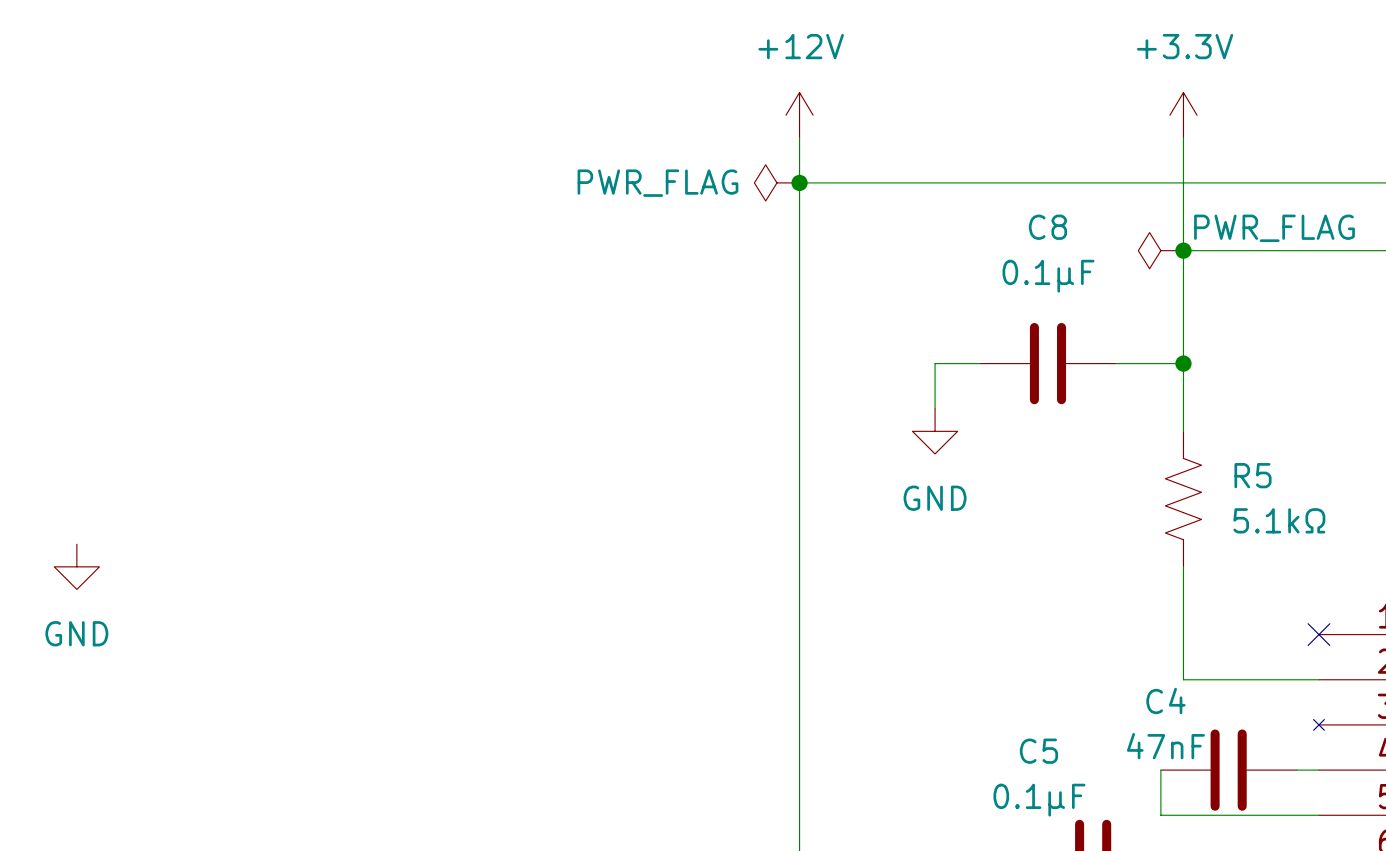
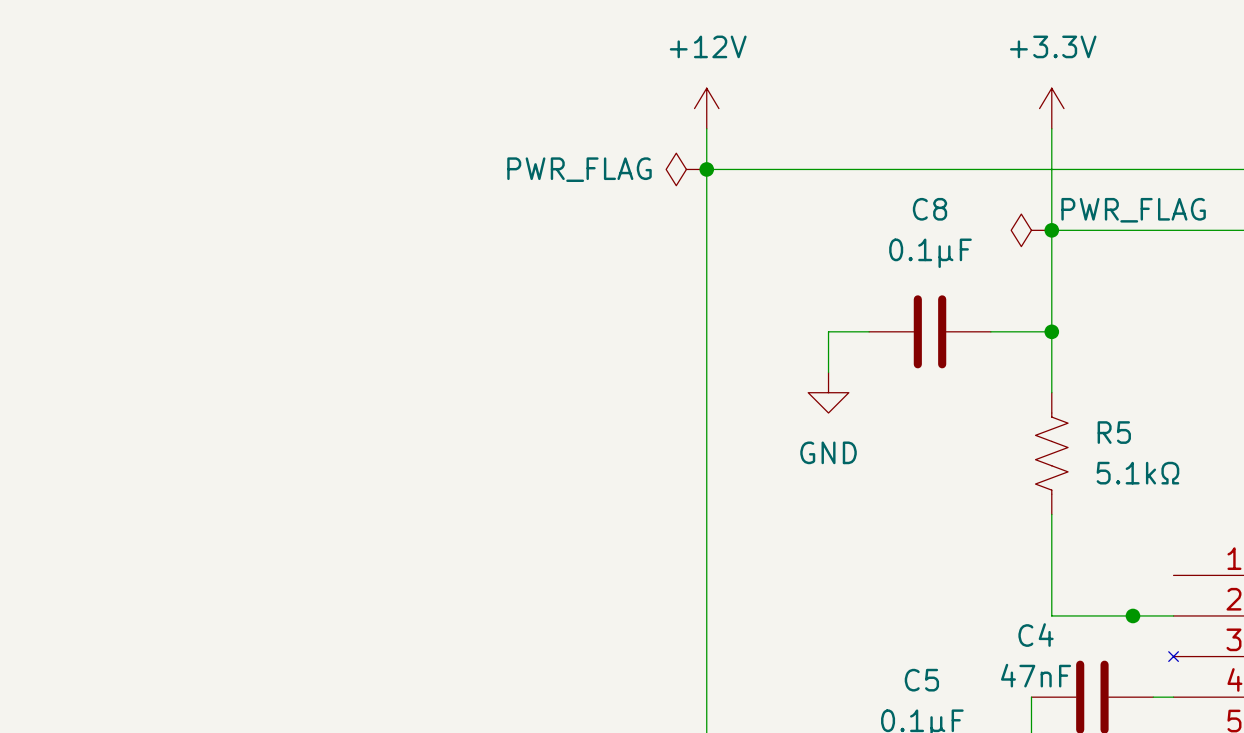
power symbol: GND (76, 566) -> none
no-connect mark: (1318, 634) -> none
junction: none -> (1132, 615)

